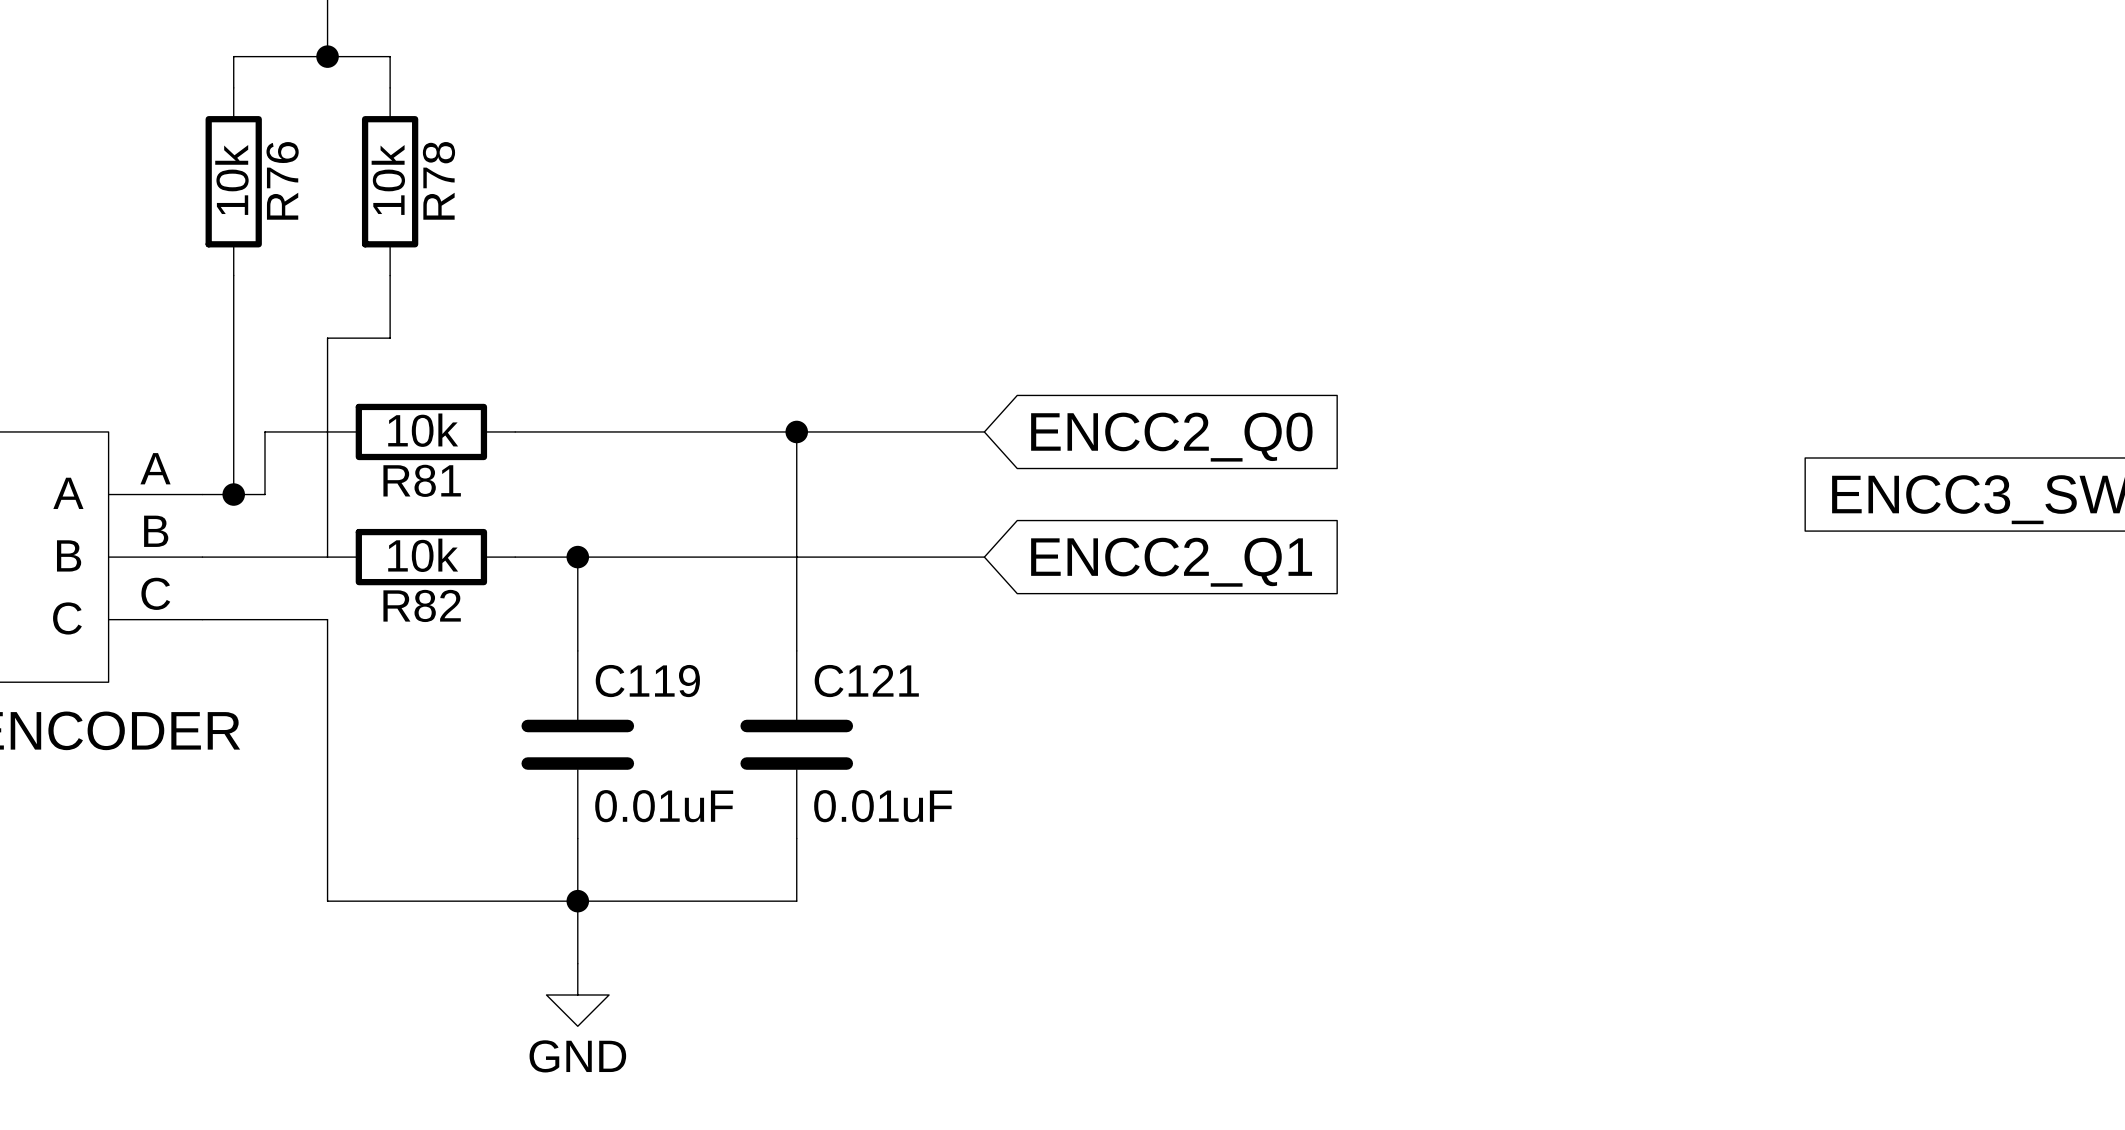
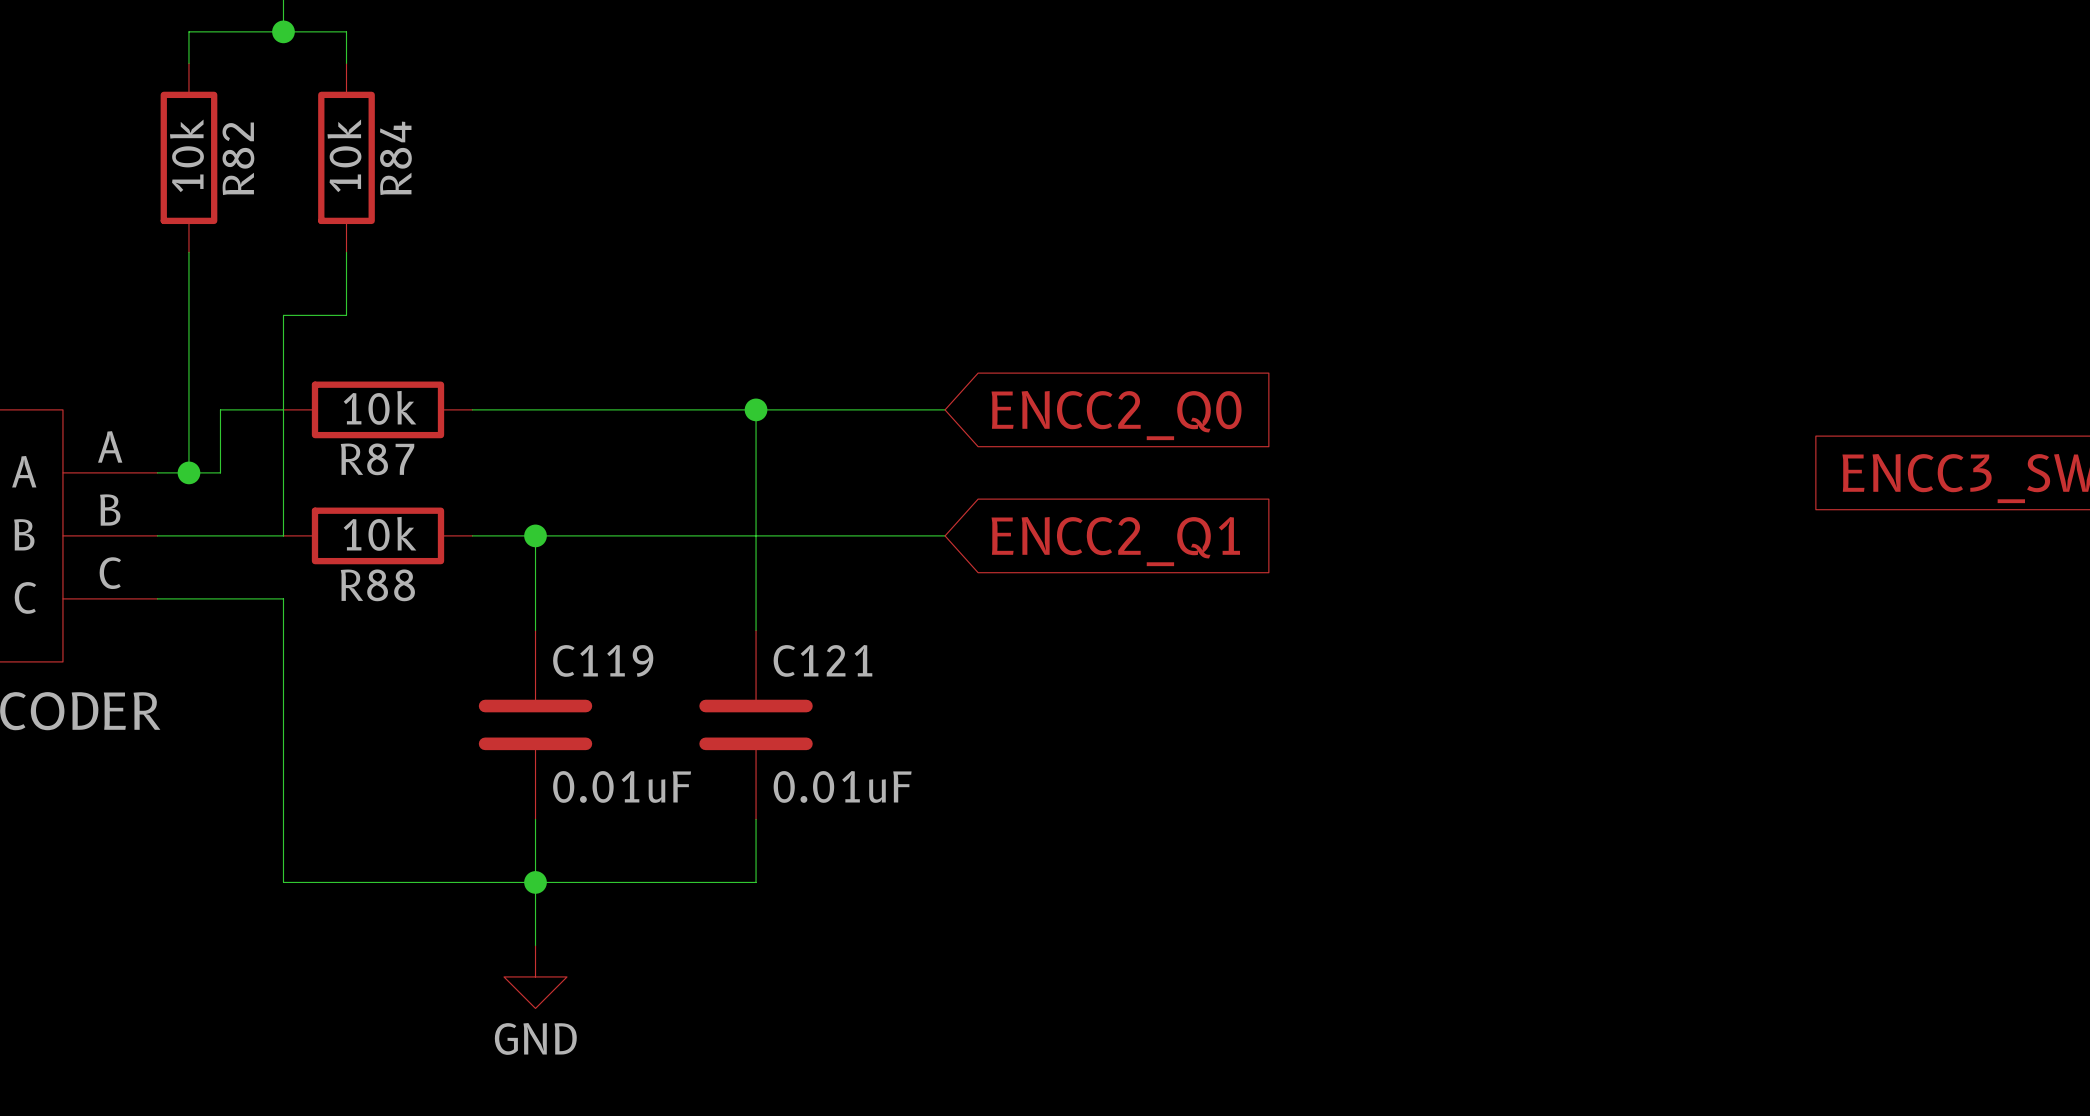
R76 name: R76 (282, 180) -> R82 (238, 158)
R78 name: R78 (438, 180) -> R84 (395, 158)
R81 name: R81 (422, 480) -> R87 (377, 459)
R82 name: R82 (422, 605) -> R88 (377, 585)

